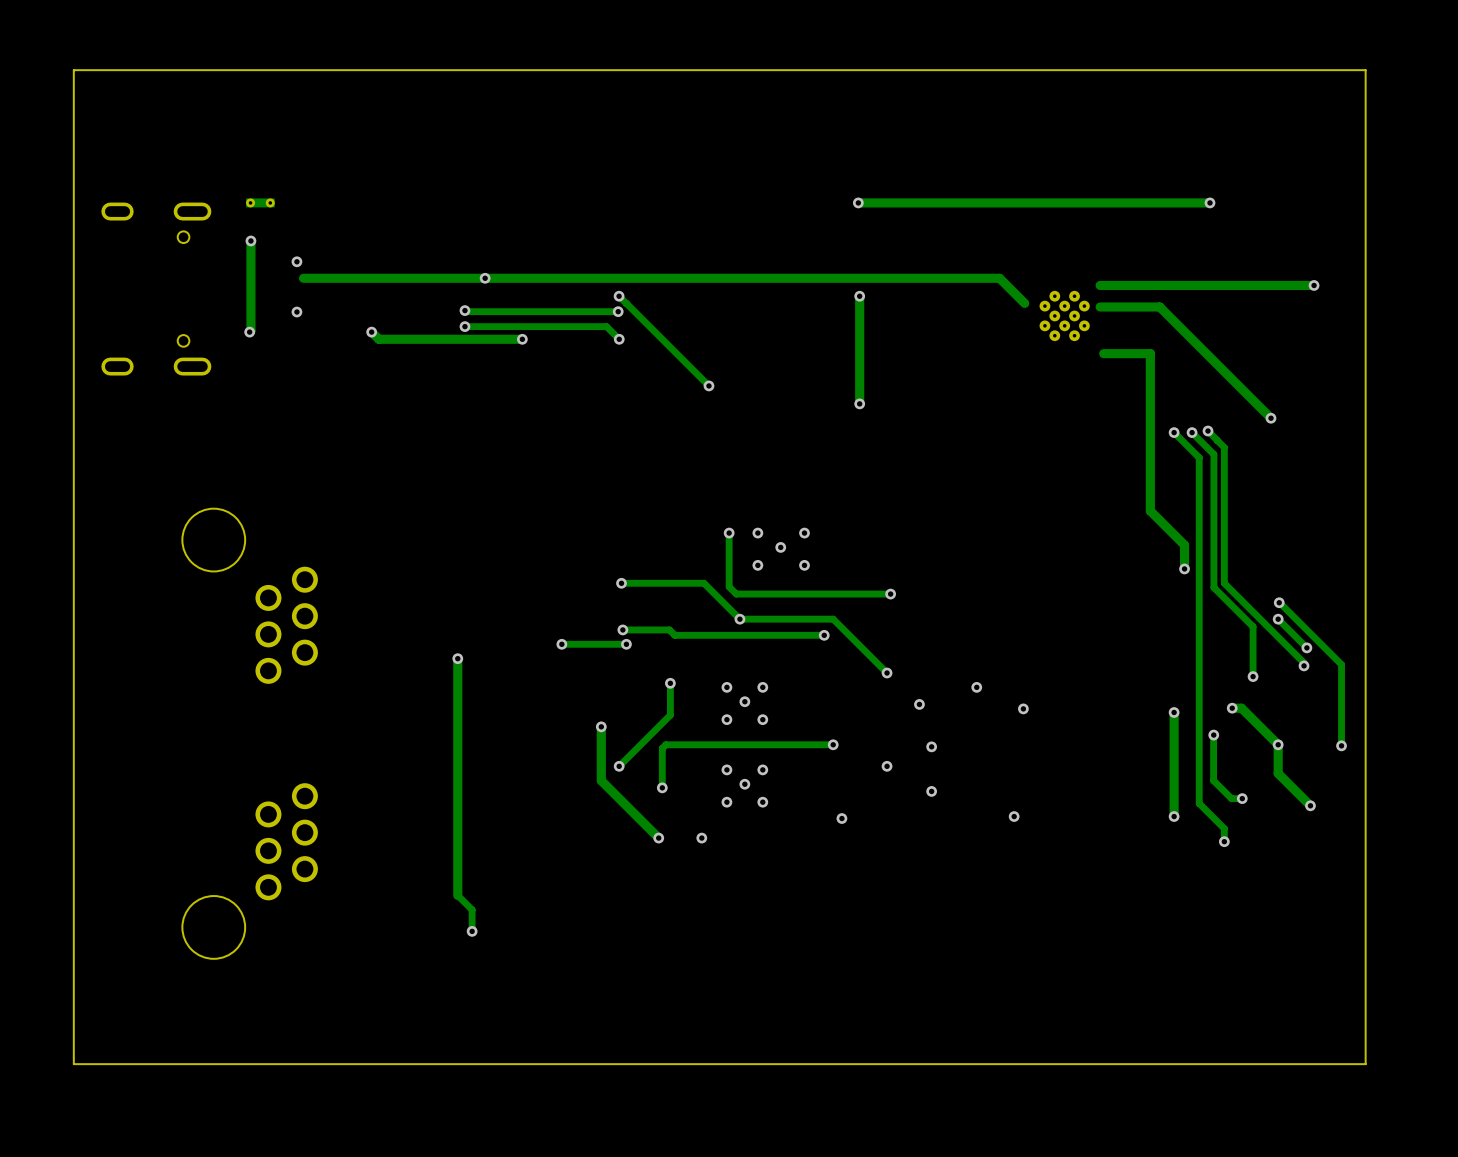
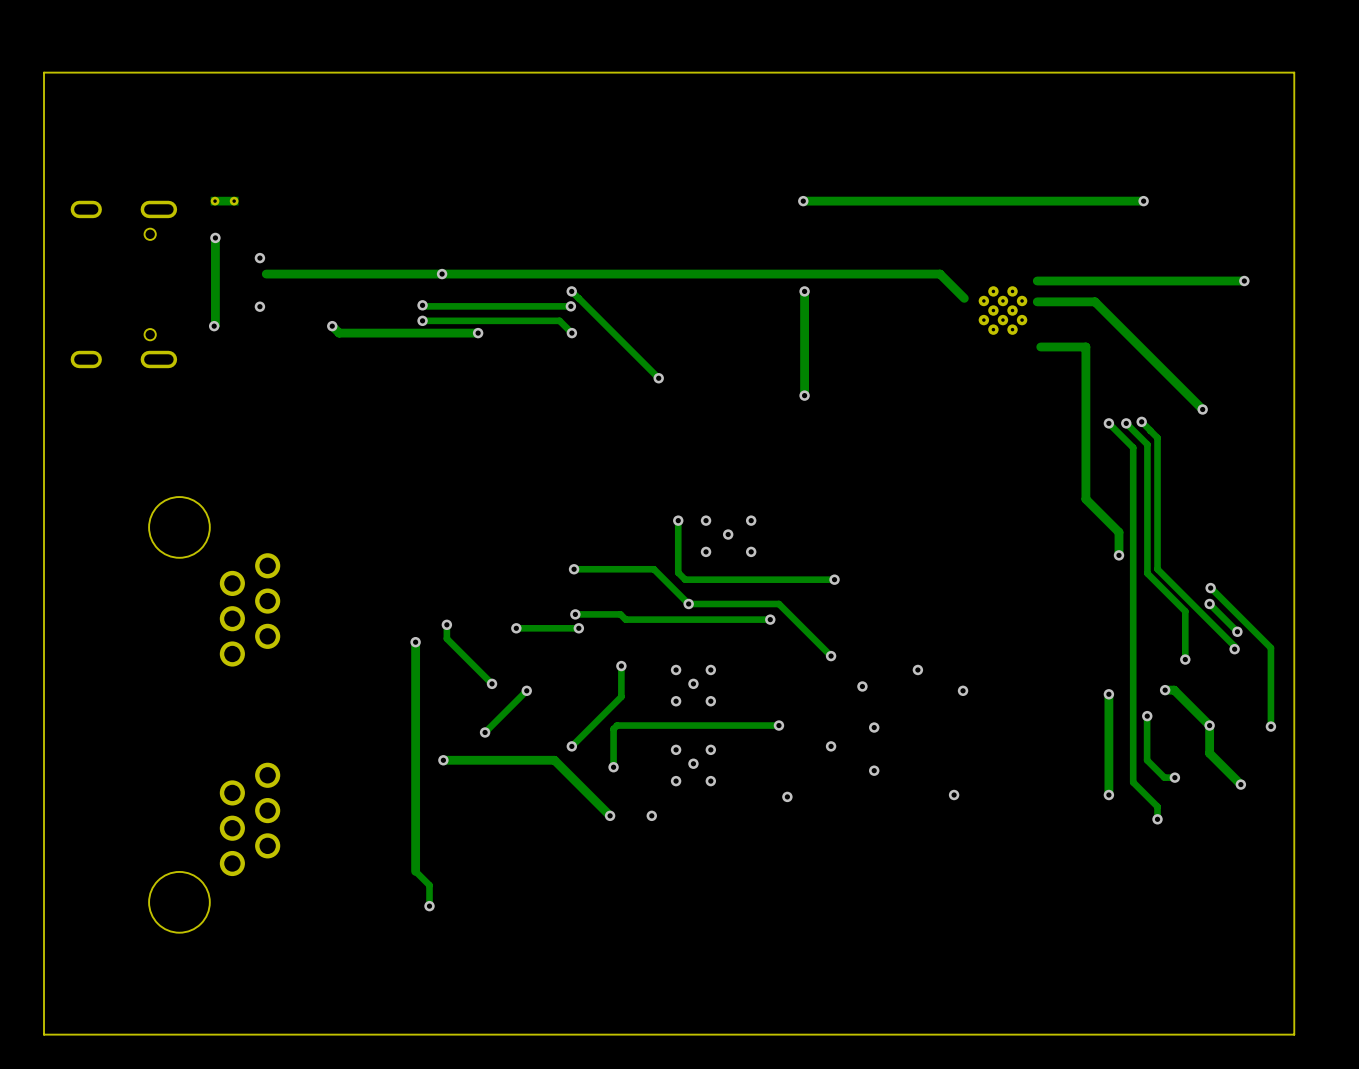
track: none -> (446, 624) (446, 638) (492, 683)
via: none -> (446, 624)
via: none -> (492, 683)
track: none -> (526, 690) (485, 732)
track: (601, 726) (601, 780) -> (443, 760) (554, 760)
via position: (601, 726) -> (526, 690)
via: none -> (485, 732)
via: none -> (443, 760)

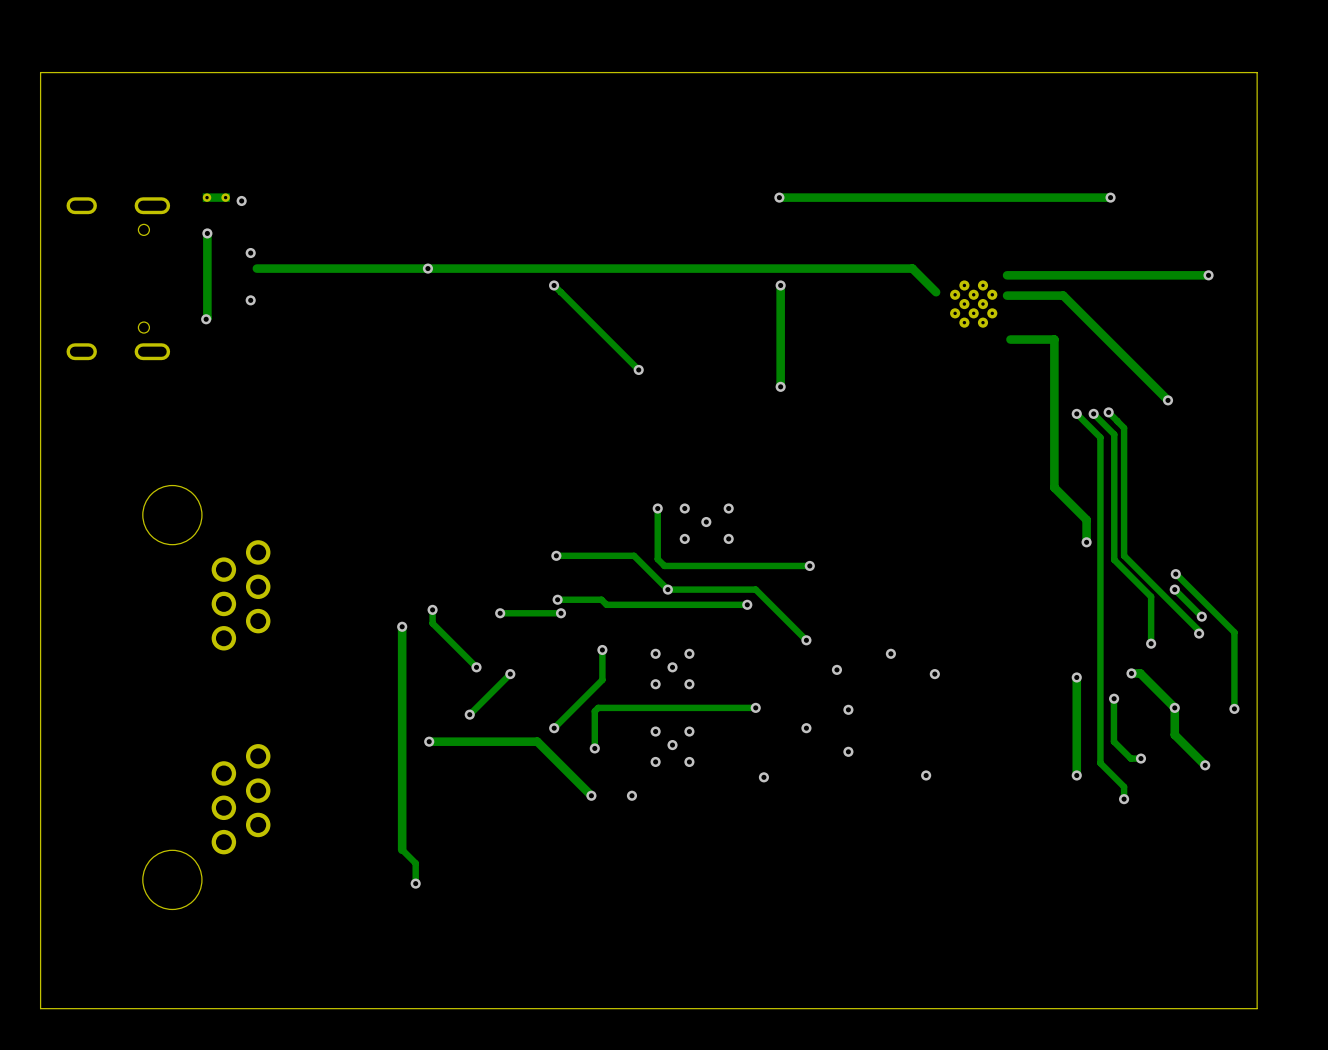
via: none -> (241, 200)
track: (422, 305) (570, 306) -> none
via: (422, 305) -> none
via: (570, 306) -> none
track: (422, 320) (559, 320) (571, 333) -> none
via: (422, 320) -> none
track: (332, 326) (339, 333) (478, 333) -> none
via: (332, 326) -> none
via: (478, 333) -> none
via: (571, 333) -> none

